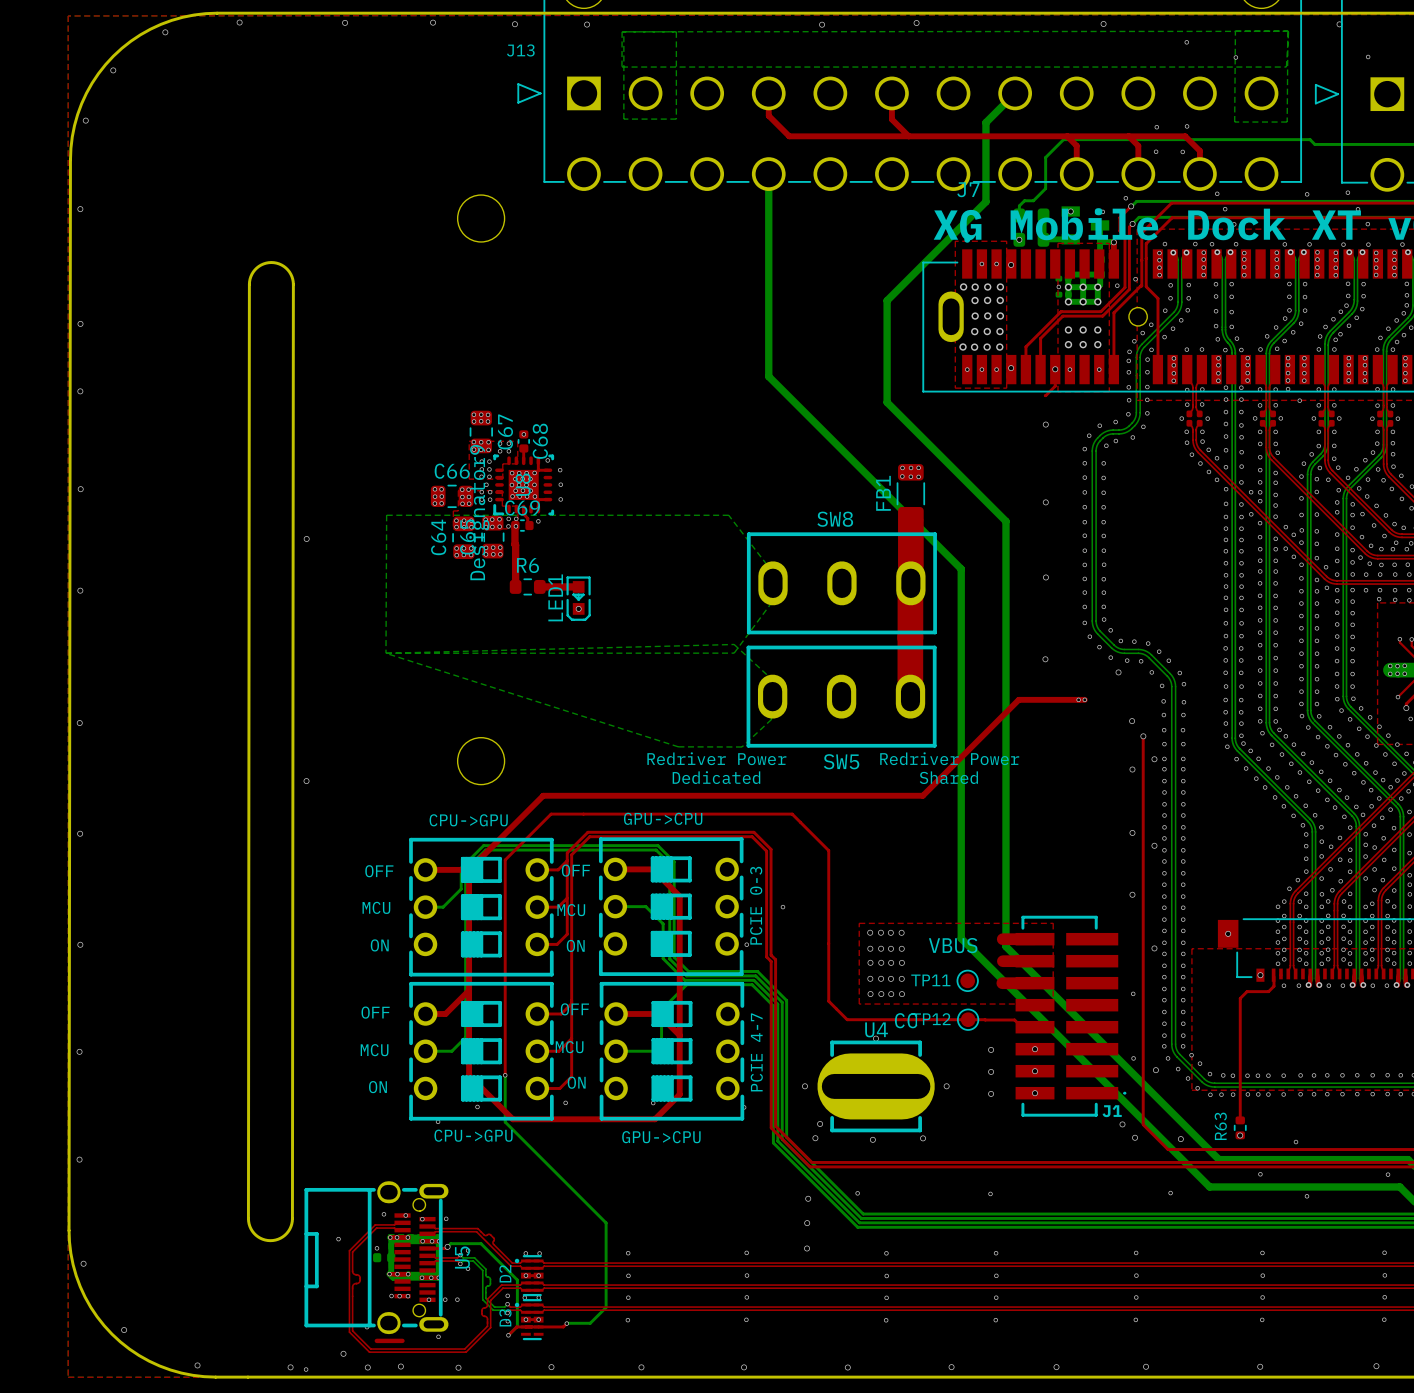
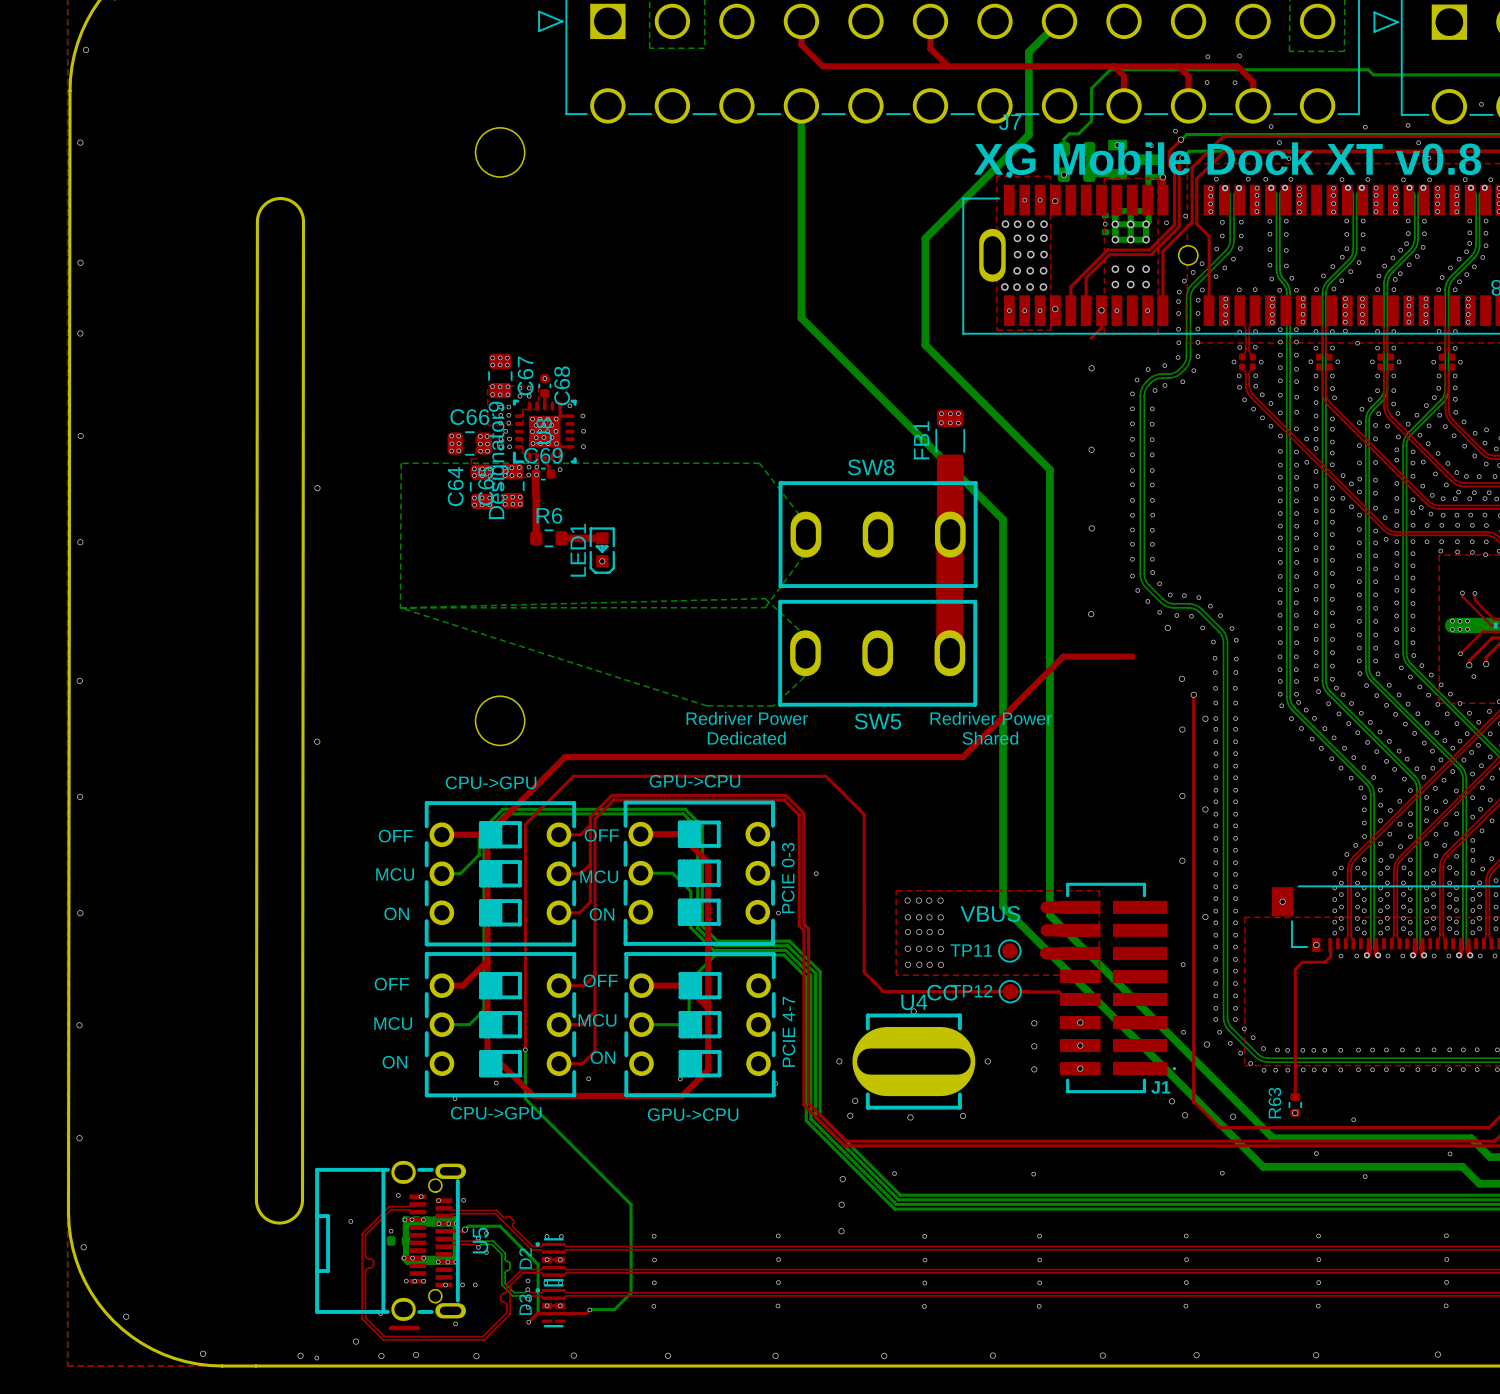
via: (1078, 699) -> none
via: (1084, 699) -> none

